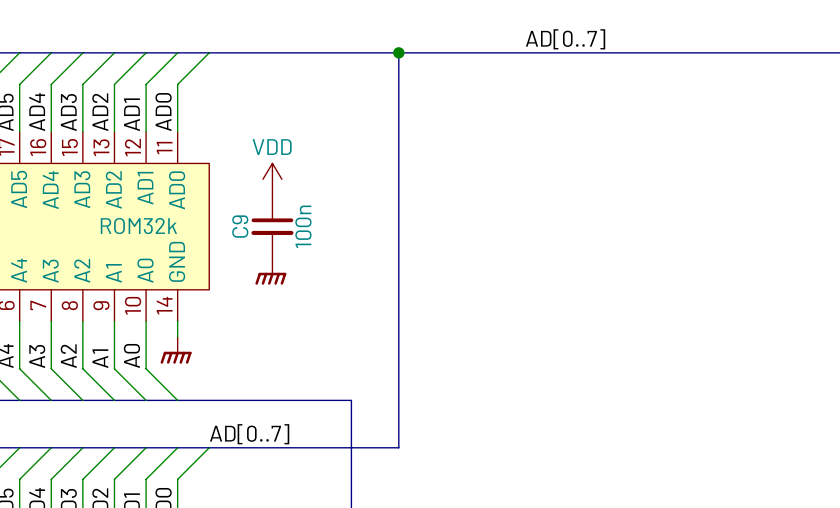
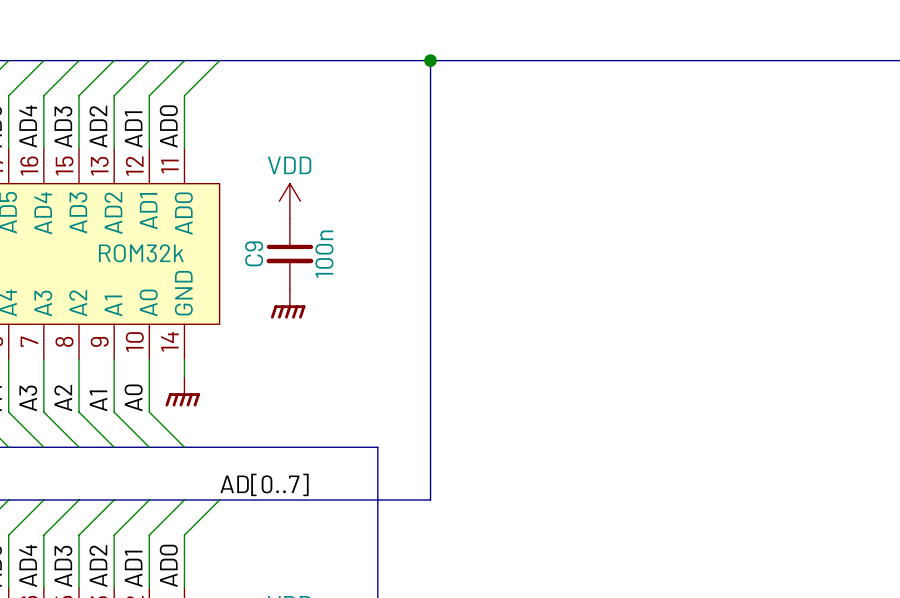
label: AD[0..7] (565, 39) -> none

